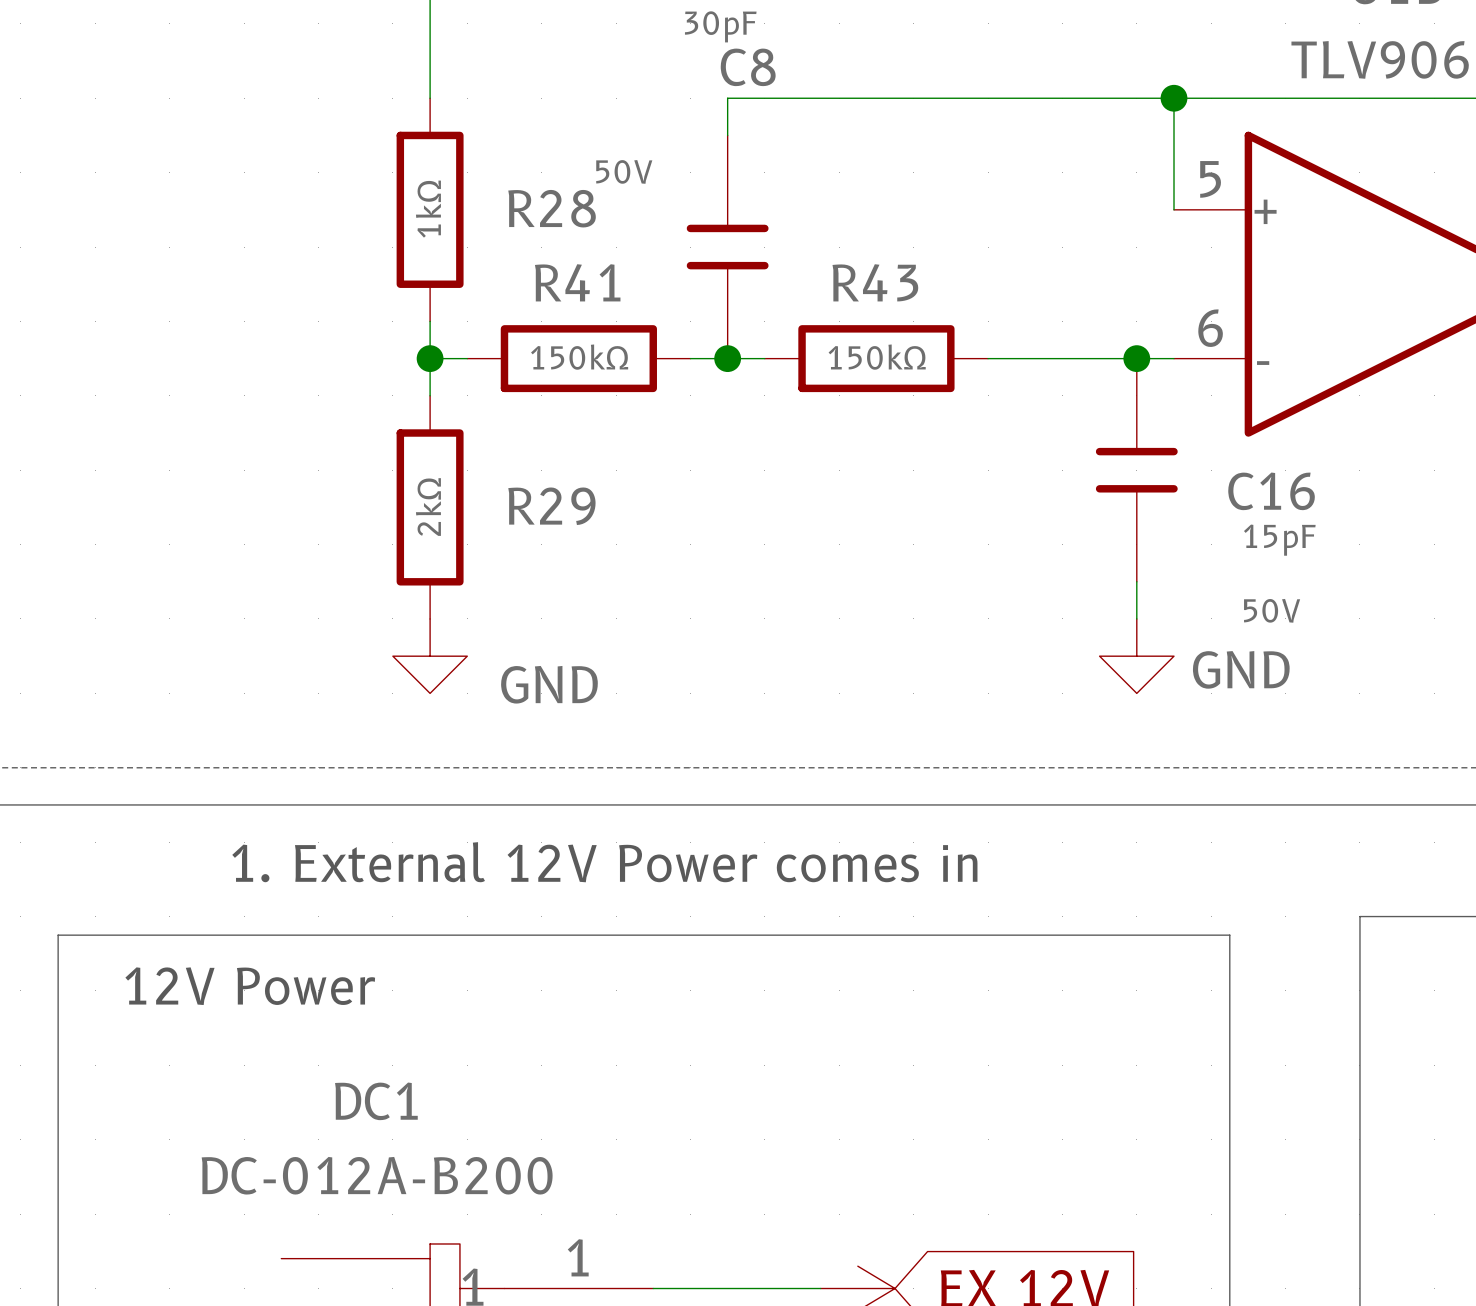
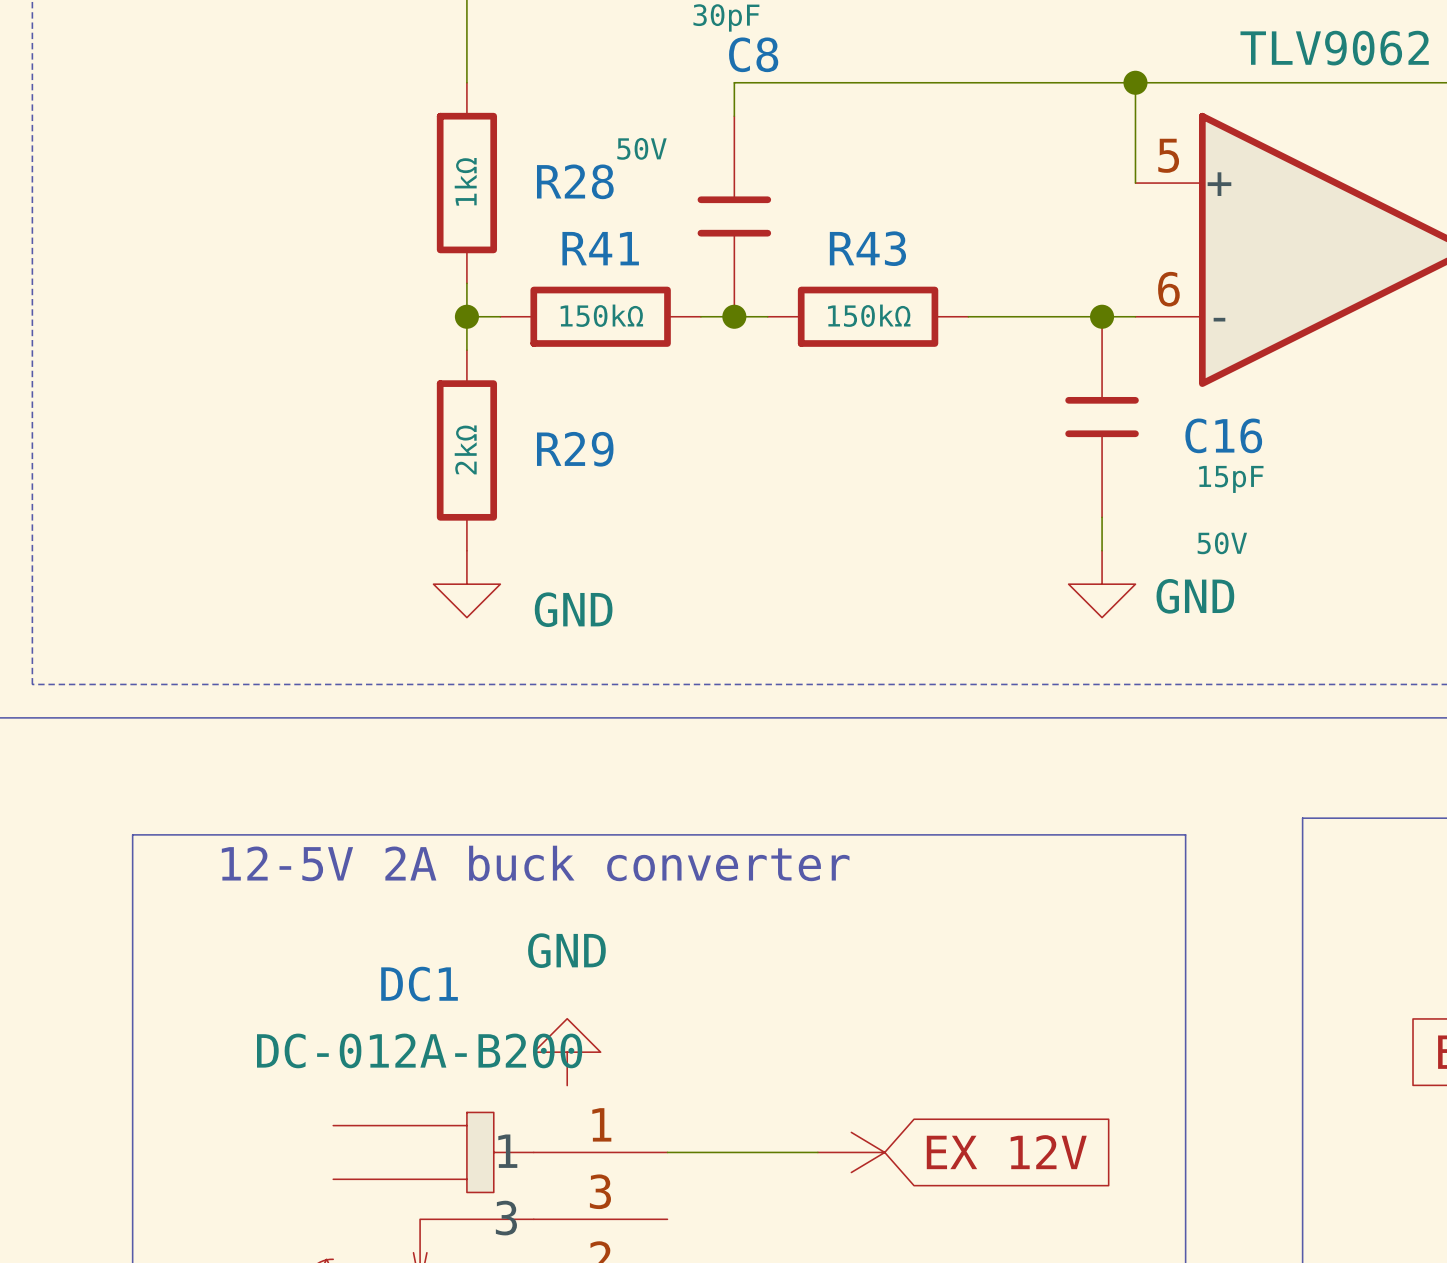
text: 1. External 12V Power comes in (604, 862) -> none
text: none -> 12-5V 2A buck converter (535, 863)
text: 12V Power (250, 986) -> none
power symbol: none -> GND (567, 1052)

